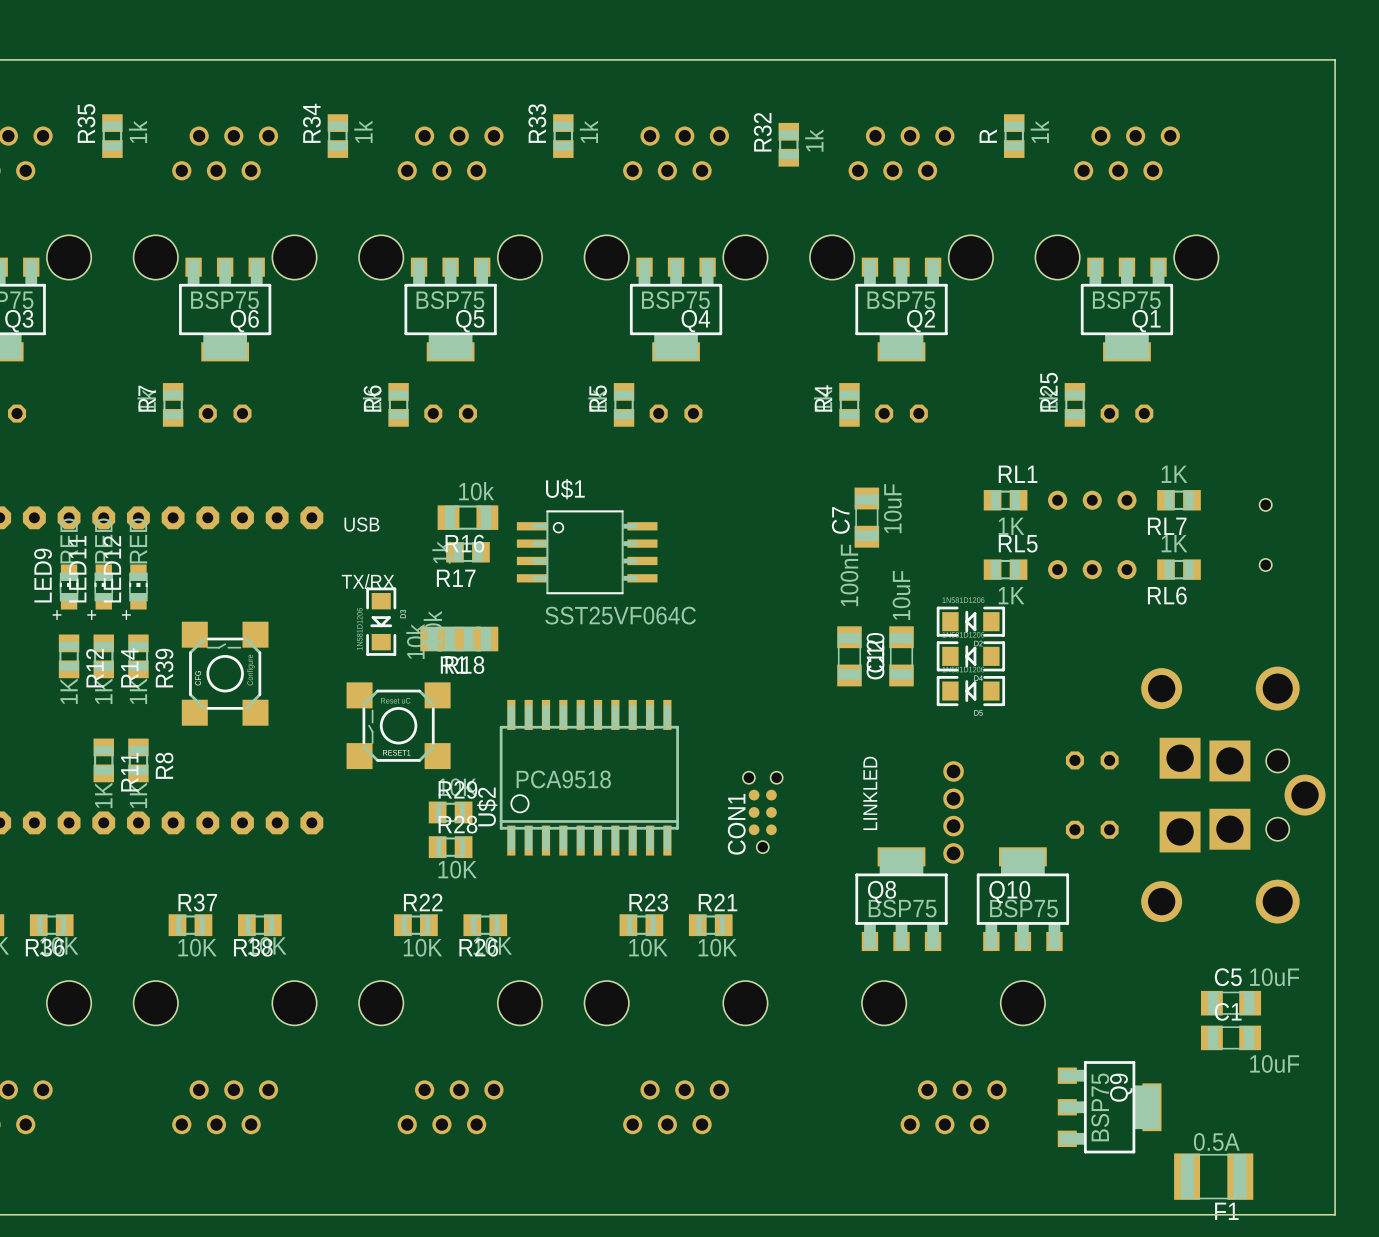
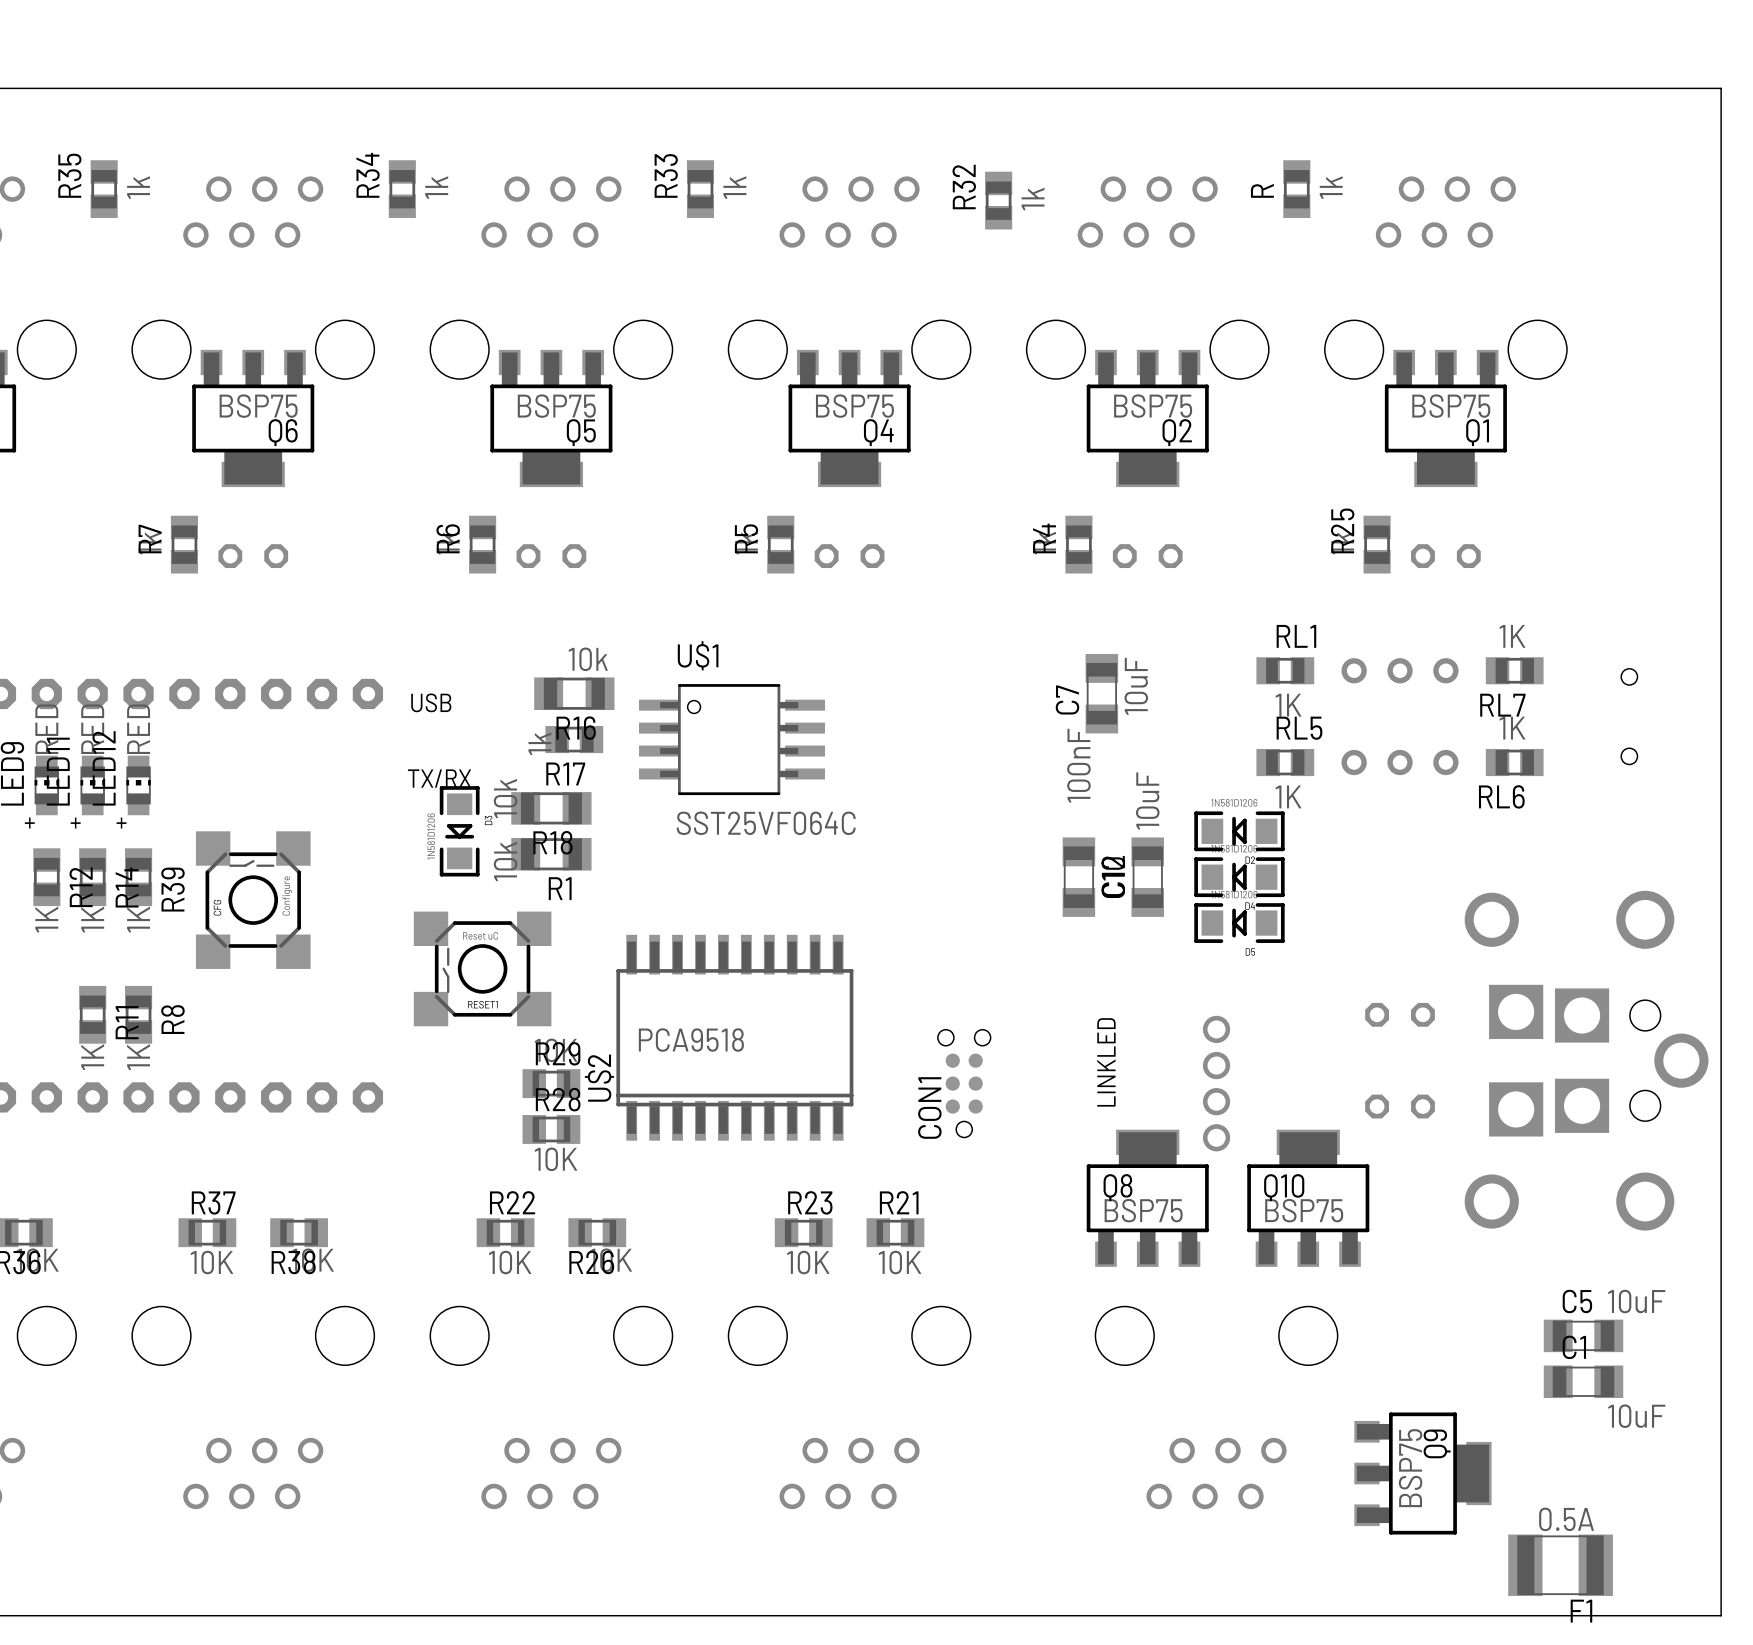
R18 position: (467, 639) -> (551, 808)
U$2 footprint: [499, 699, 679, 856] -> [616, 934, 854, 1141]

